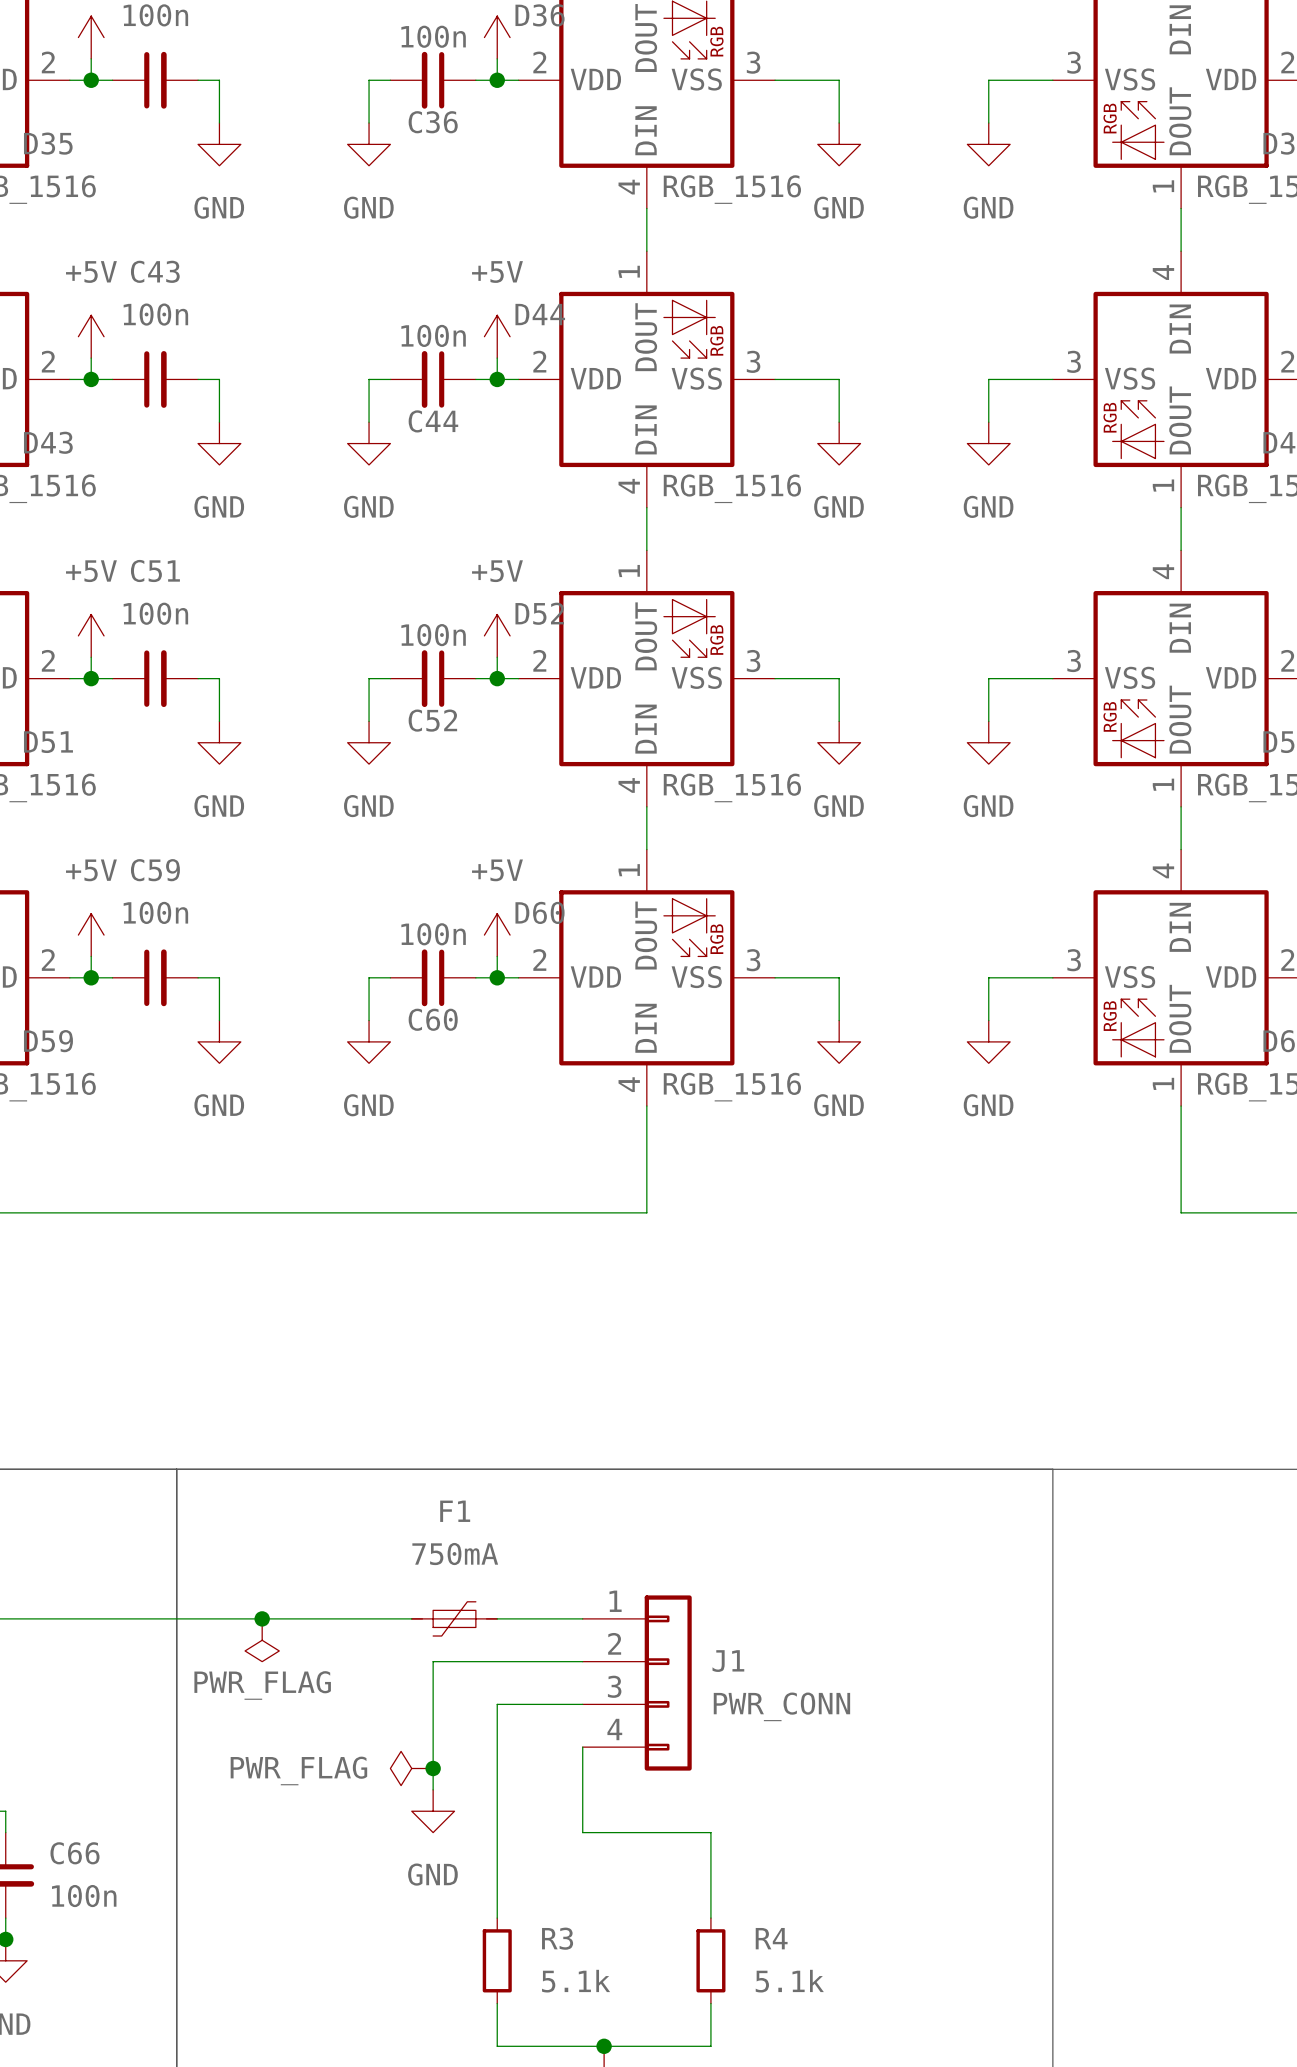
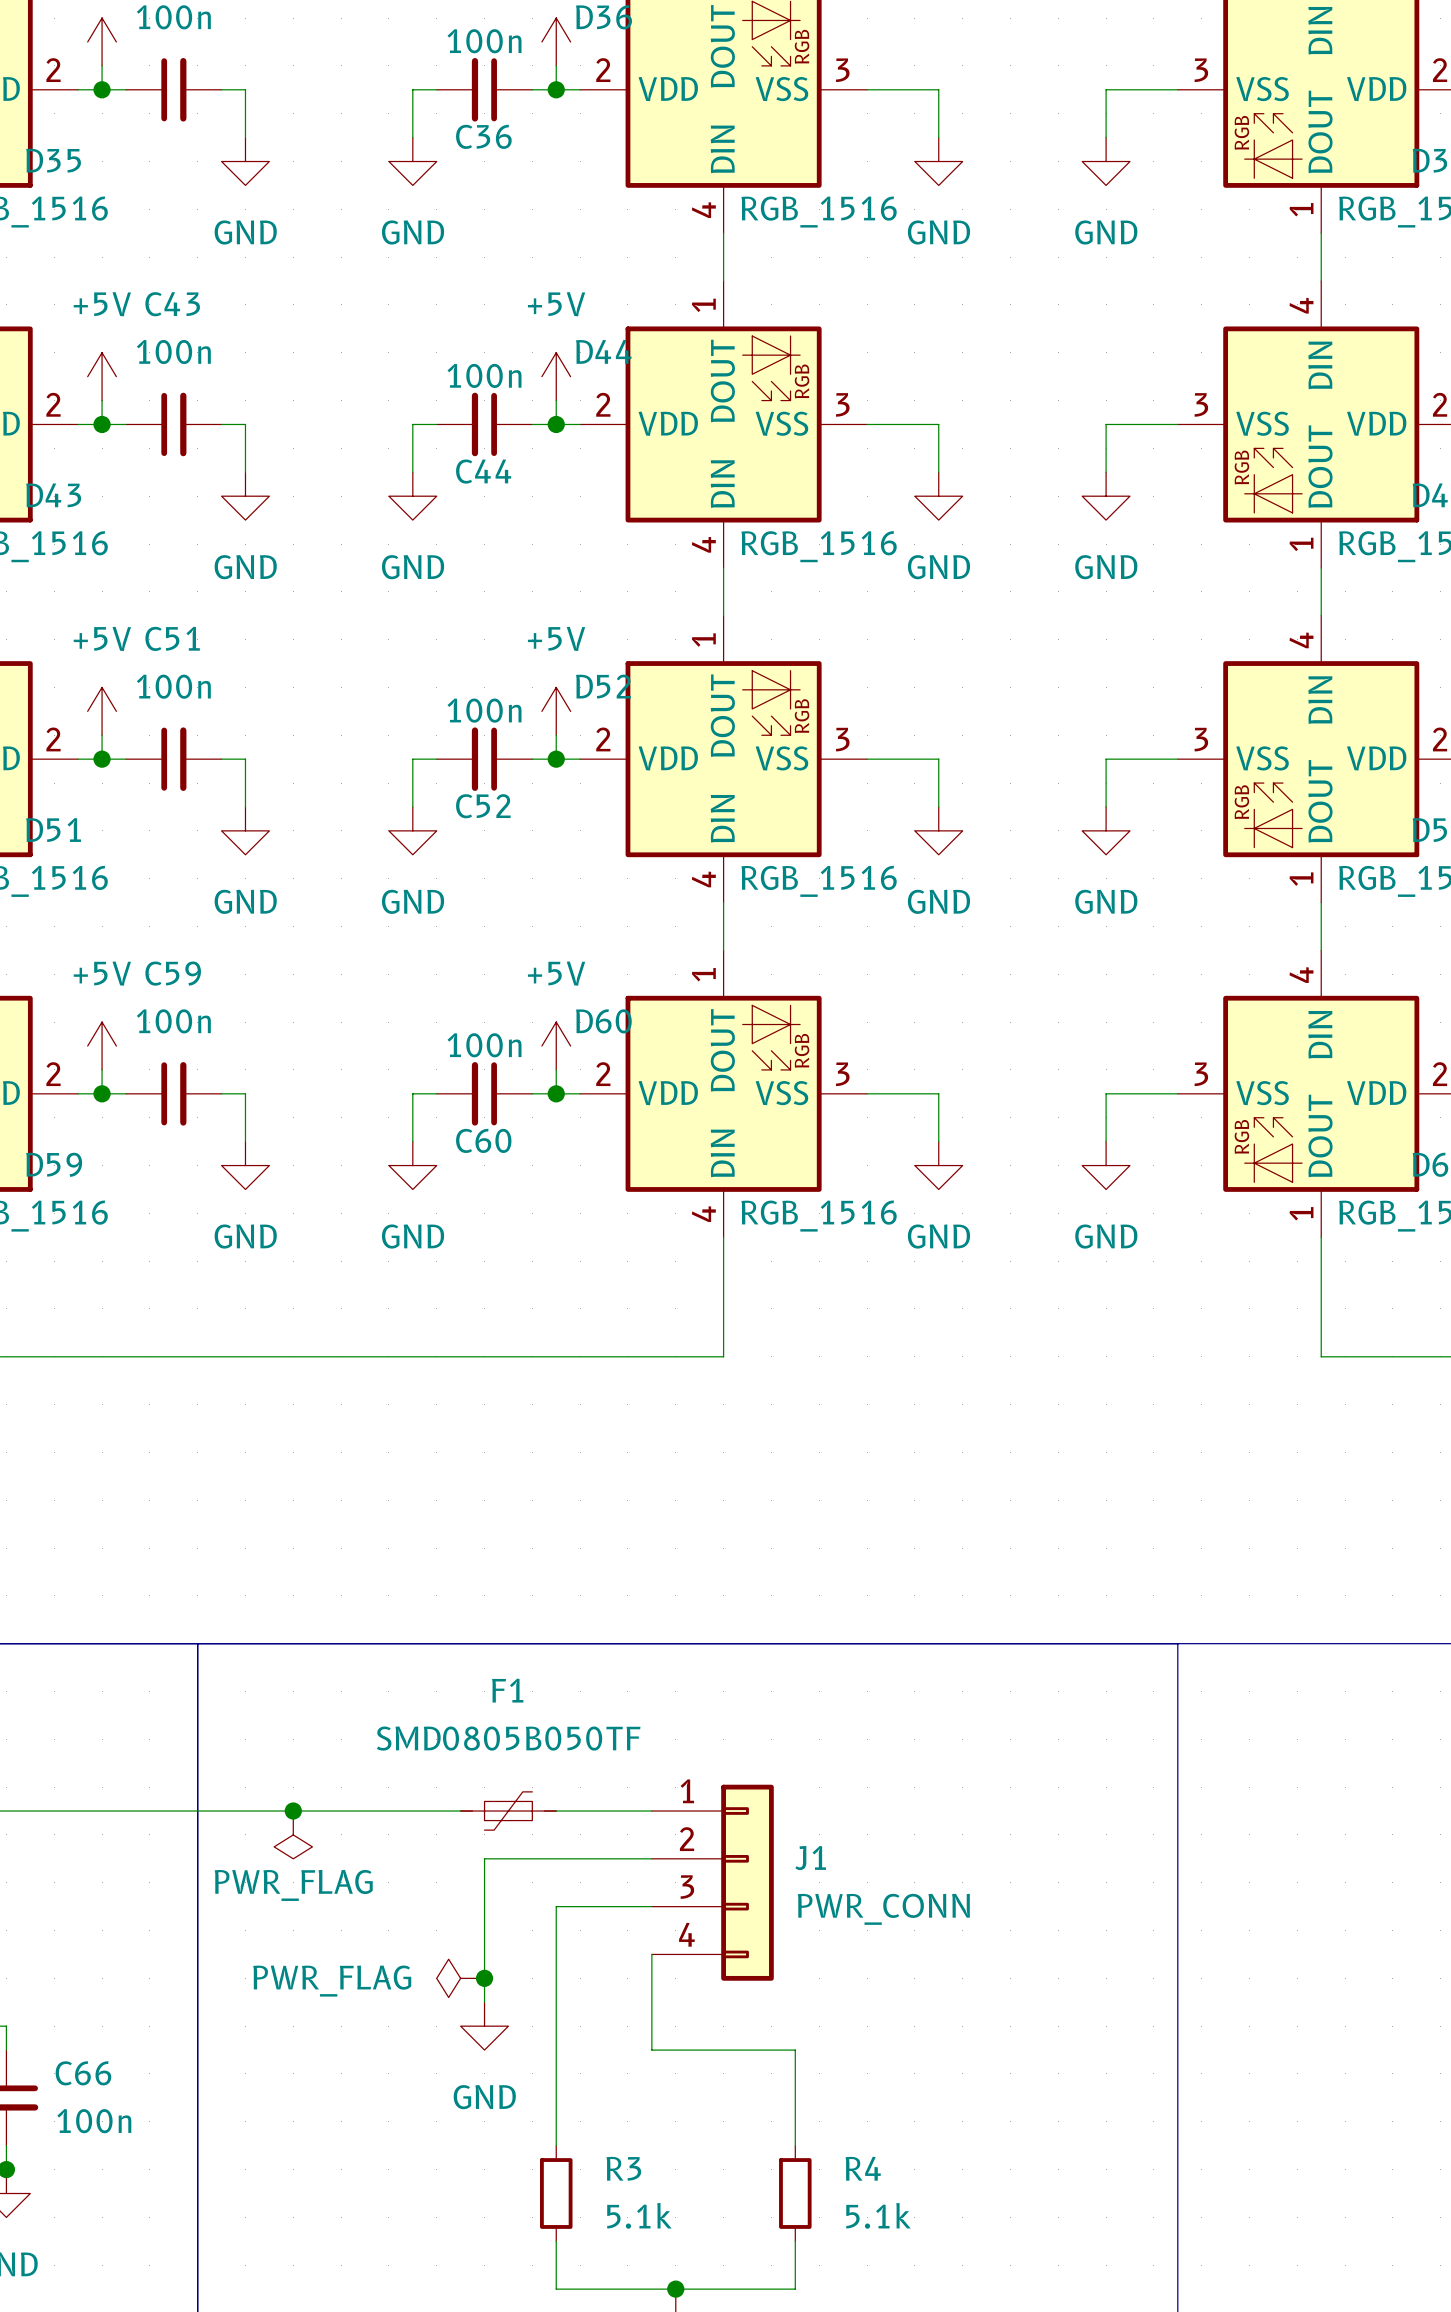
F1 value: 750mA (455, 1554) -> SMD0805B050TF (508, 1738)

